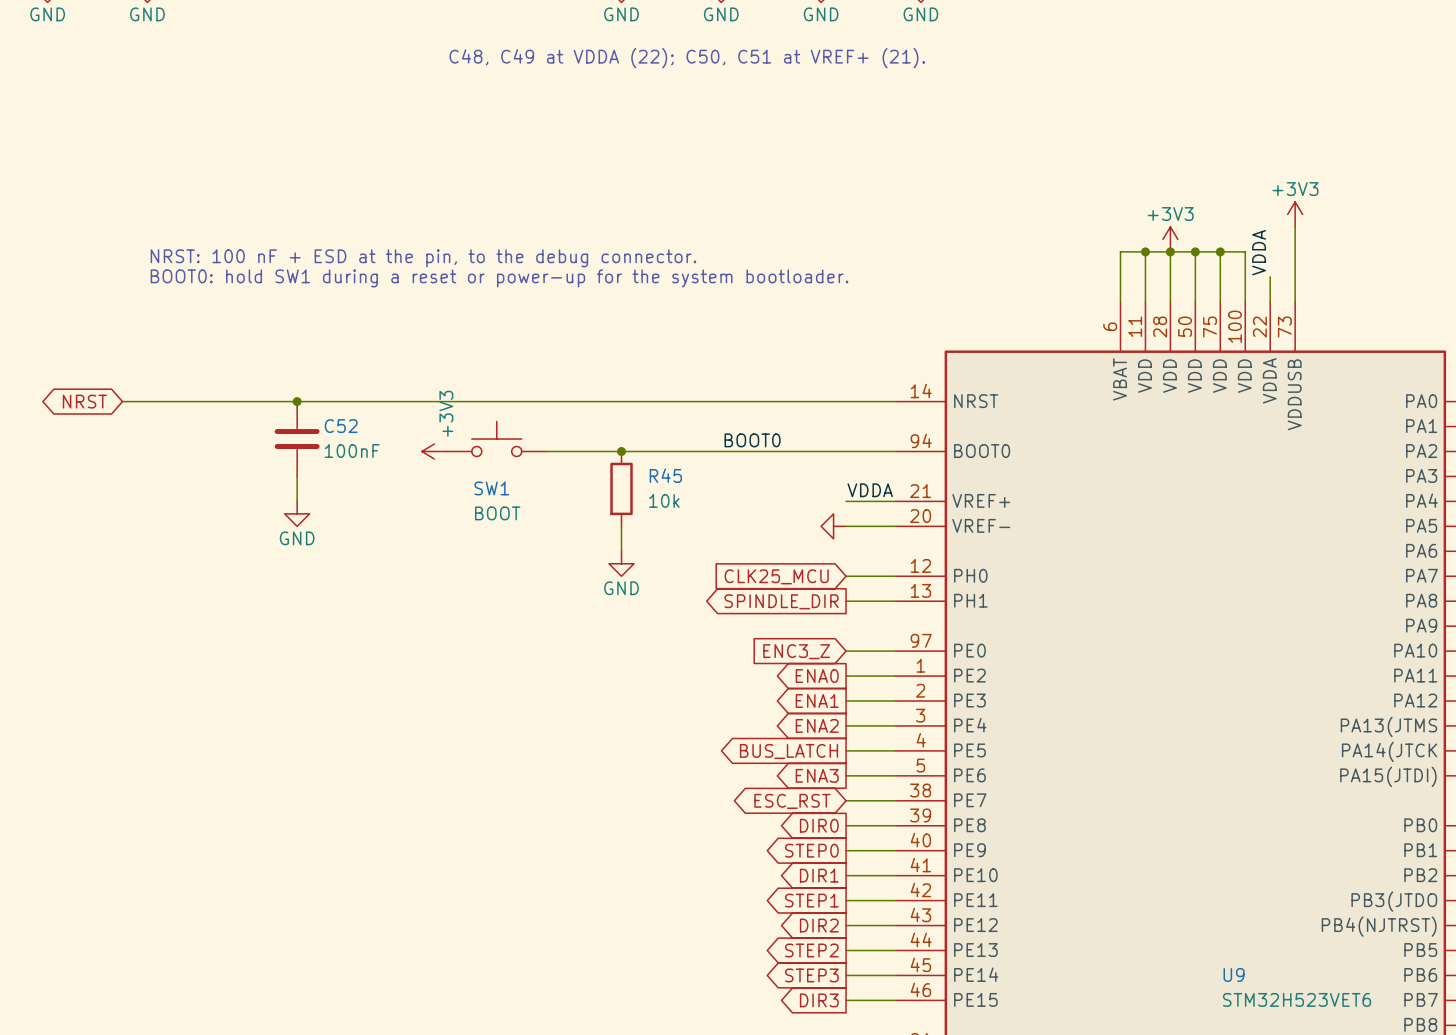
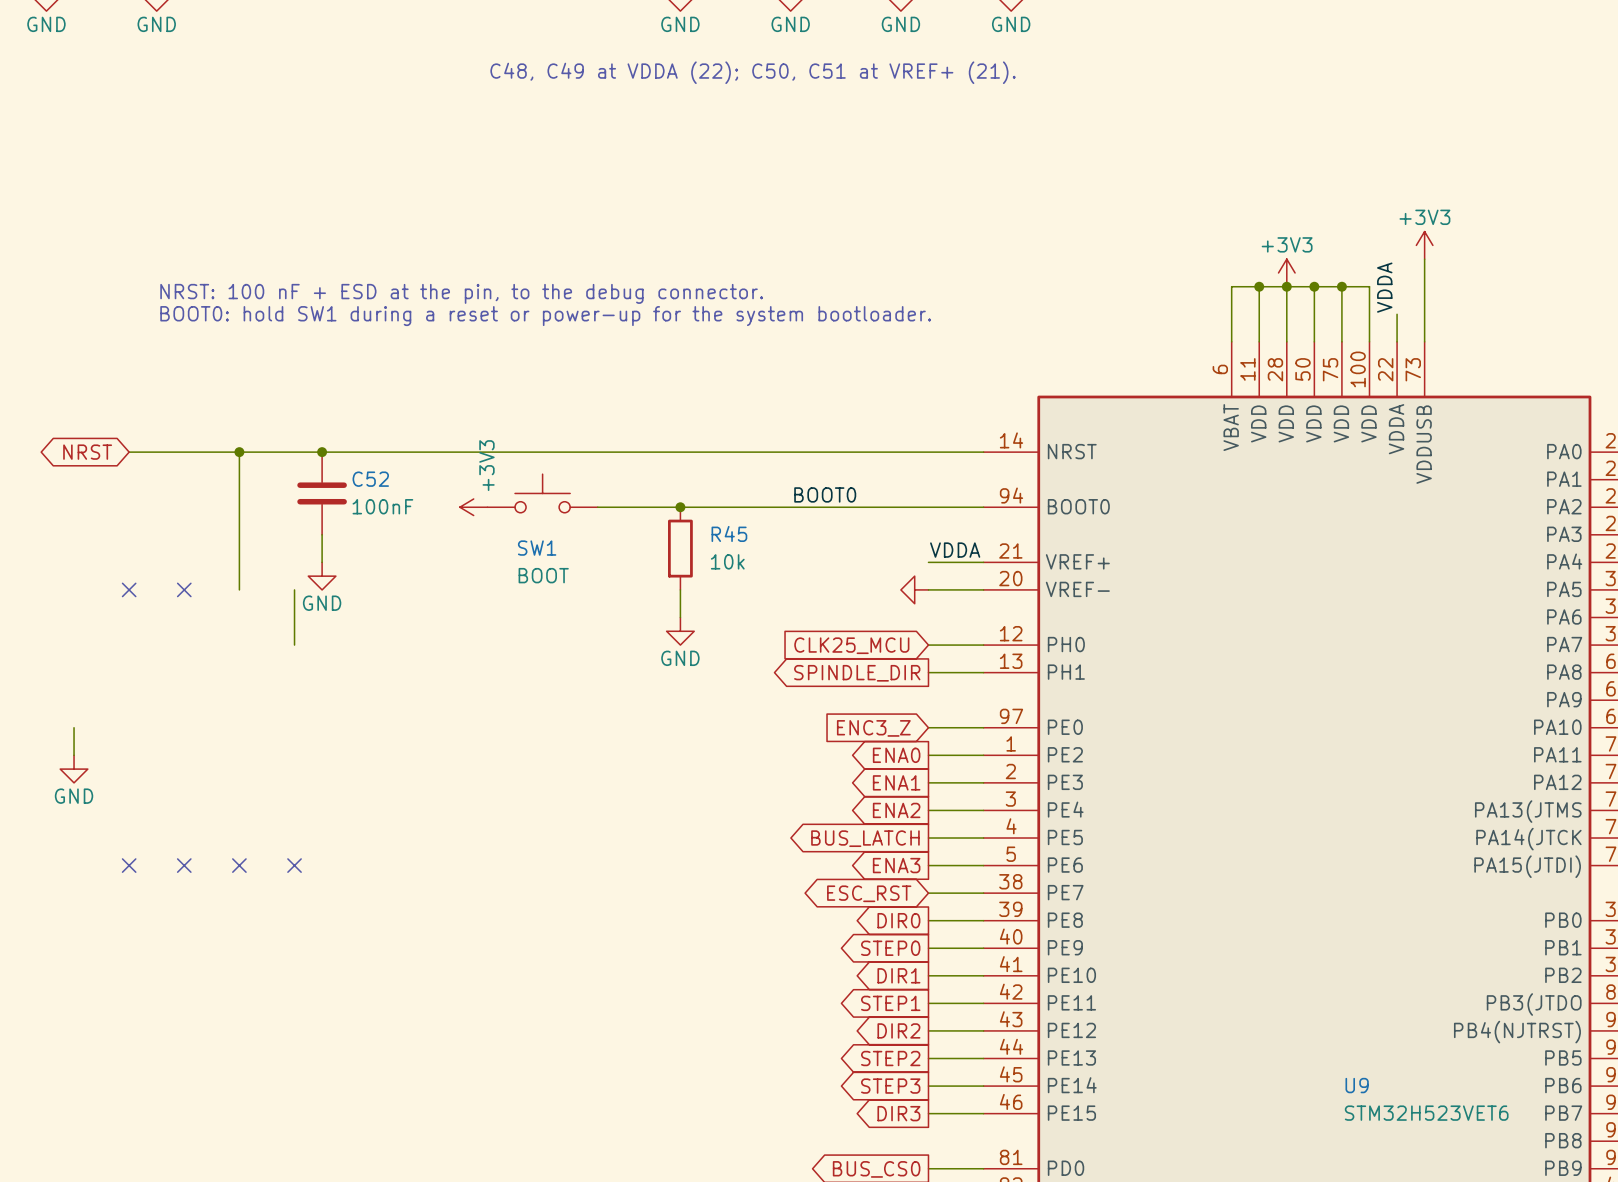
wire: none -> (239, 452) (239, 589)
junction: none -> (239, 452)
no-connect mark: none -> (129, 589)
no-connect mark: none -> (184, 589)
wire: none -> (294, 589) (294, 645)
wire: none -> (74, 727) (74, 755)
power symbol: none -> GND (74, 769)
no-connect mark: none -> (129, 865)
no-connect mark: none -> (184, 865)
no-connect mark: none -> (239, 865)
no-connect mark: none -> (294, 865)

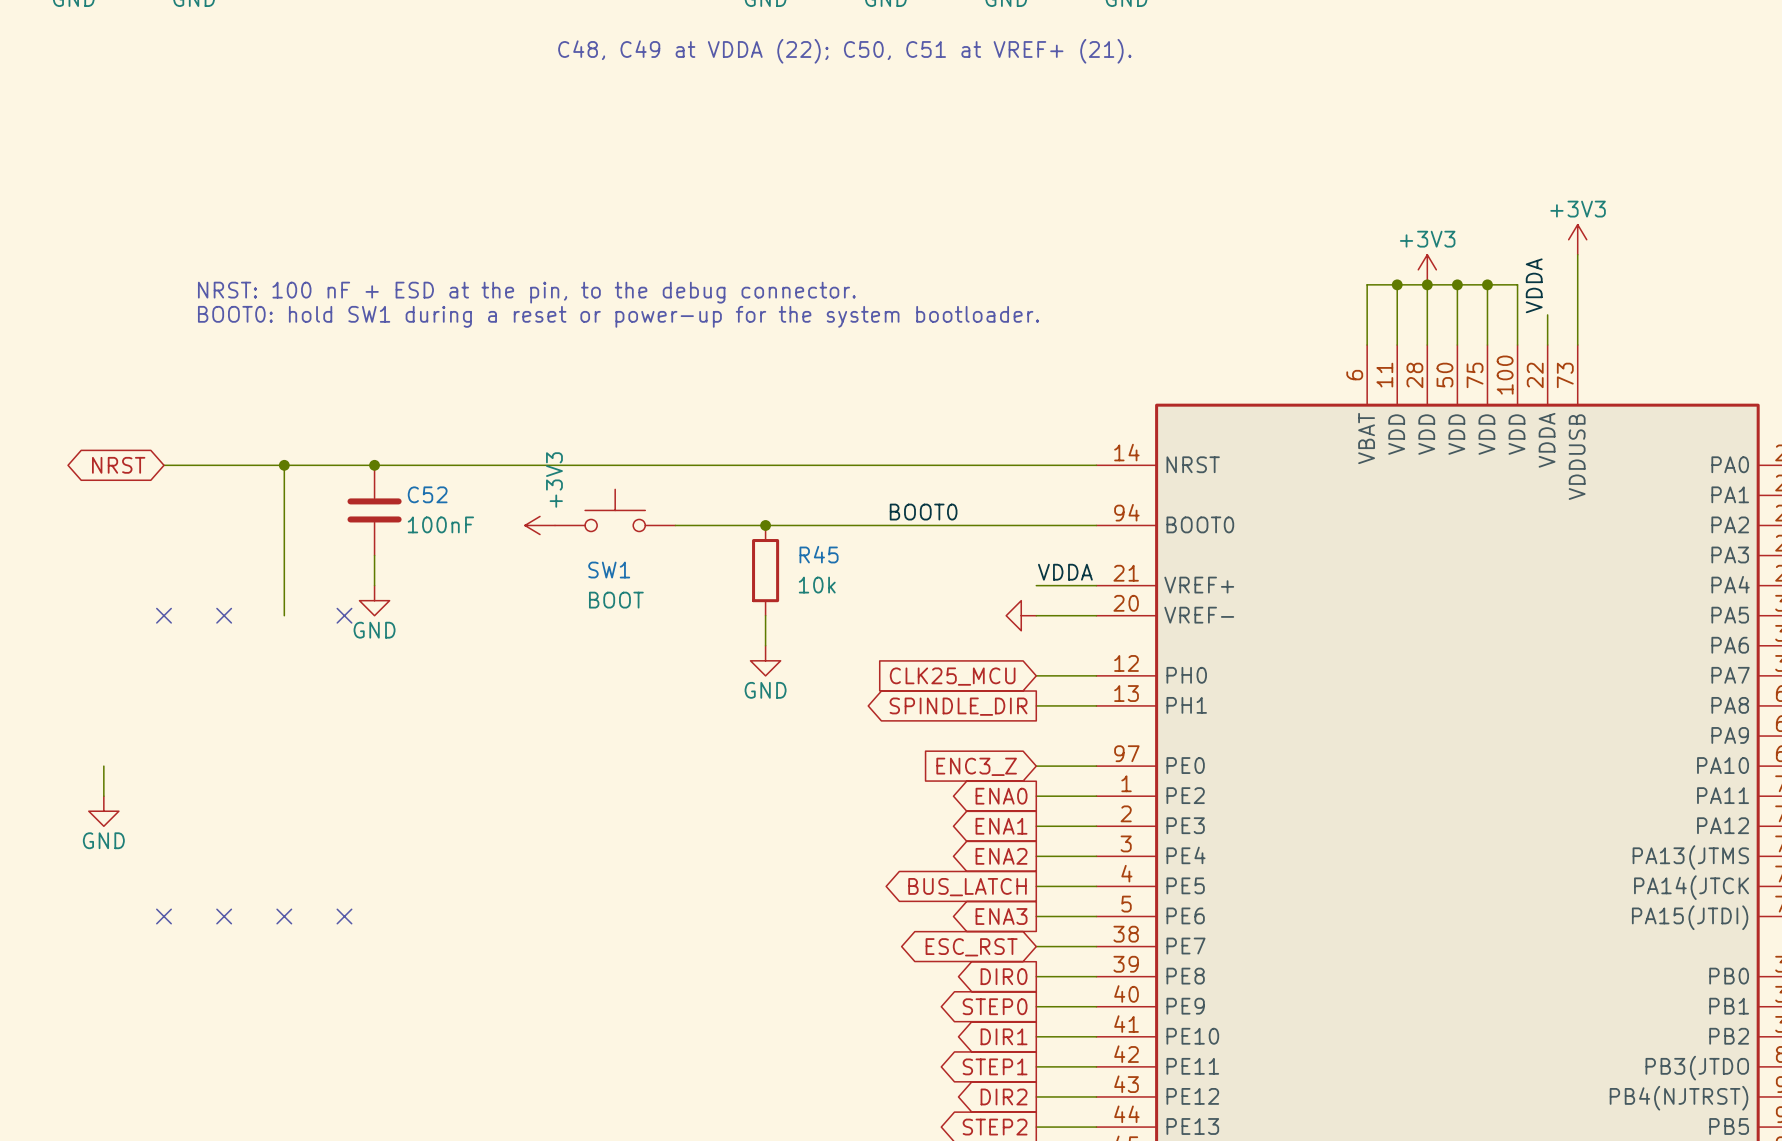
wire: (294, 589) (294, 645) -> none
no-connect mark: none -> (344, 615)

